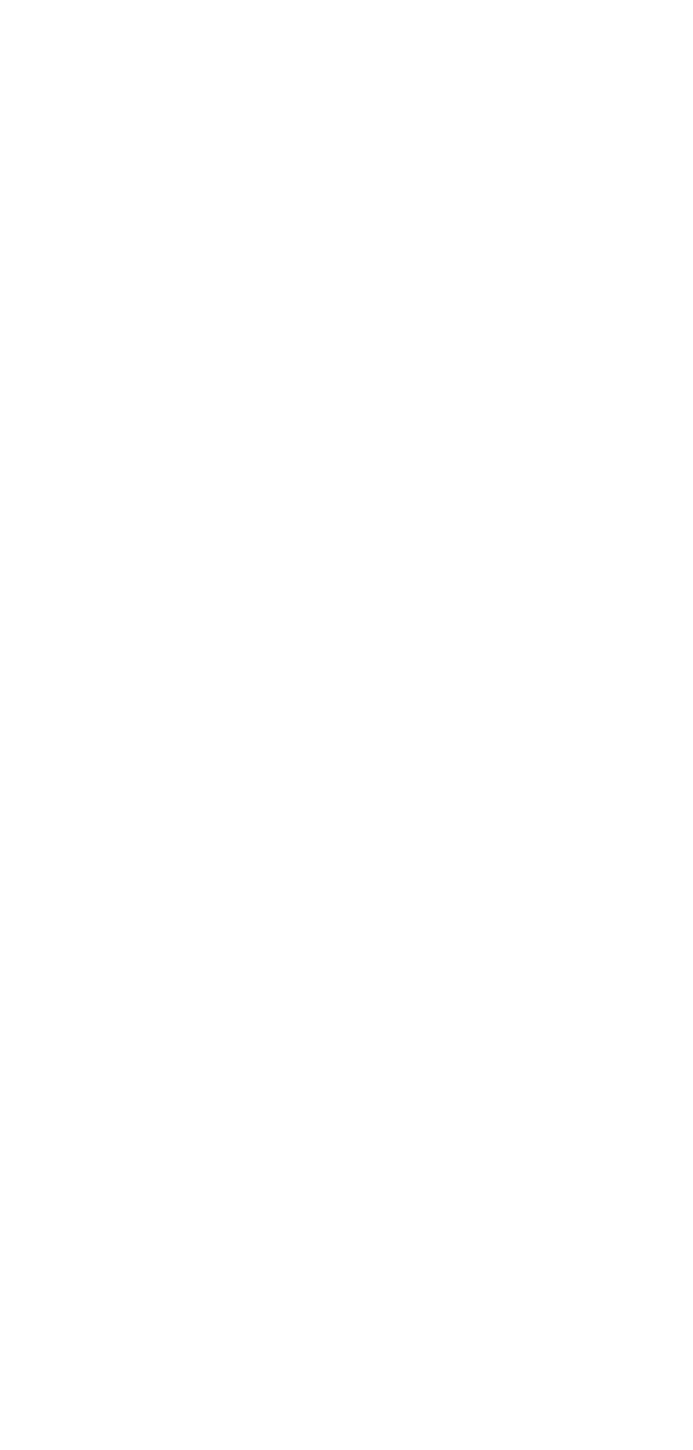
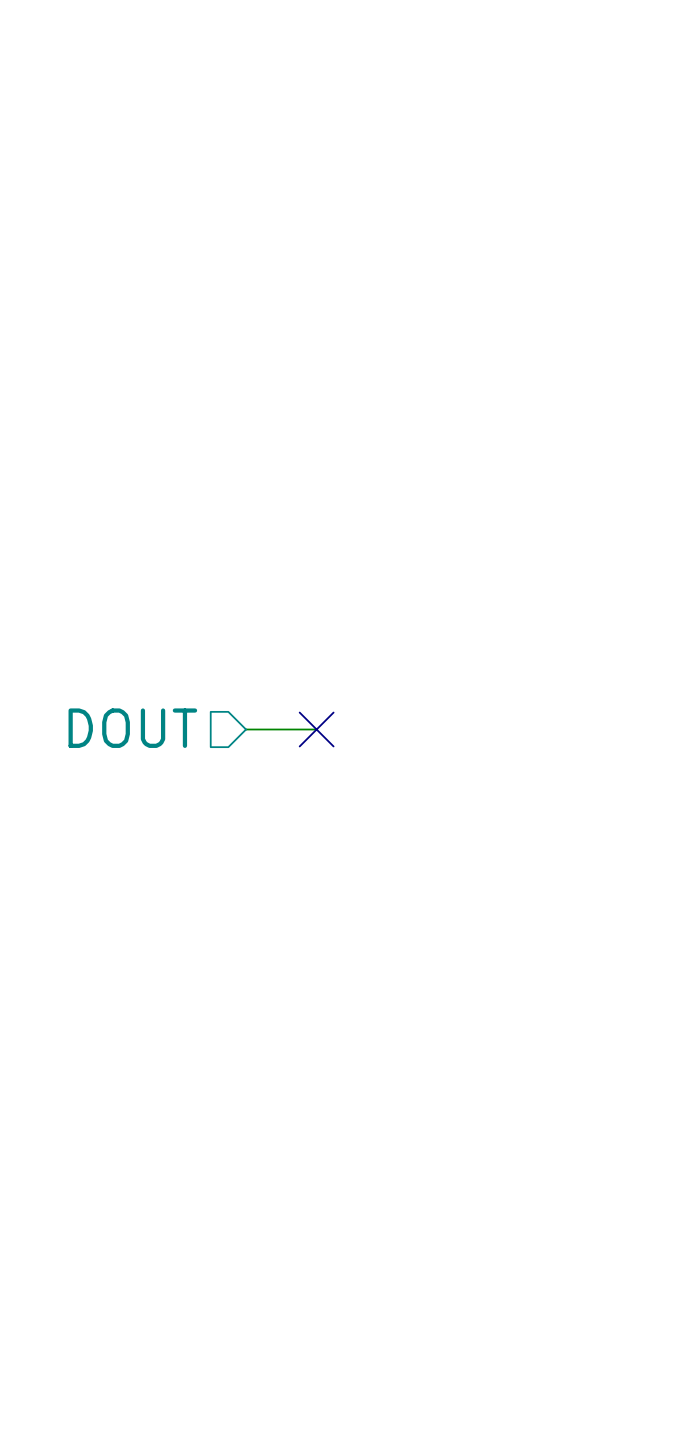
sheet pin: none -> DOUT (132, 728)
wire: none -> (246, 729) (316, 729)
no-connect mark: none -> (316, 729)

